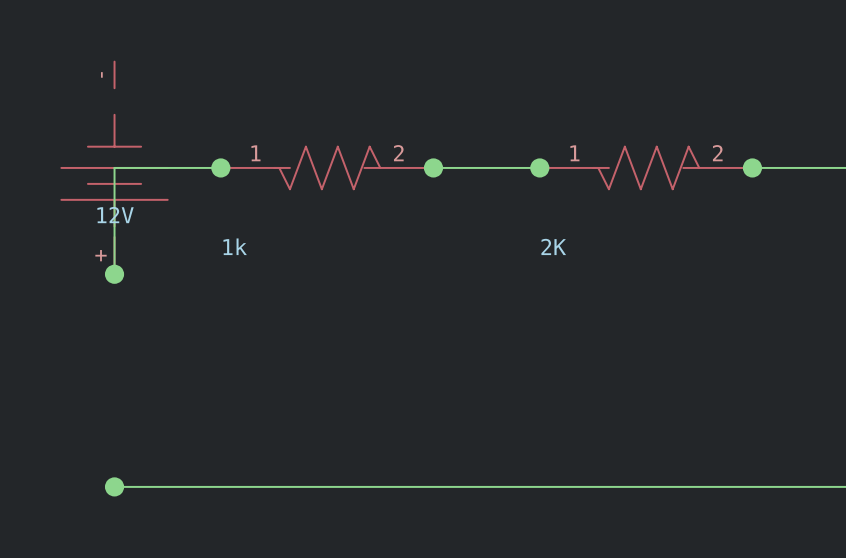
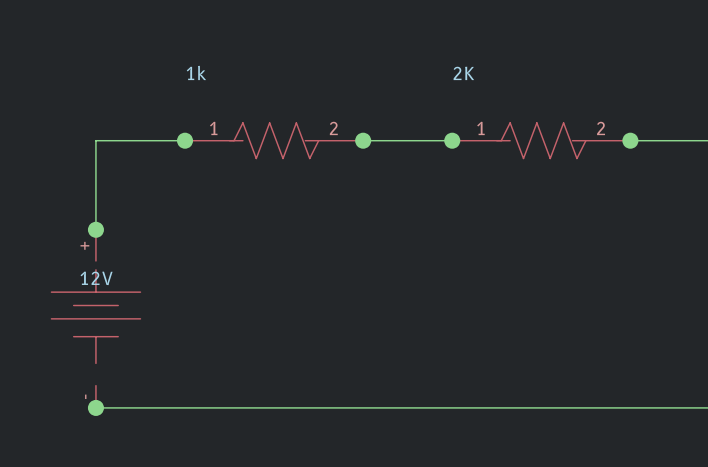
part position: (114, 167) -> (95, 318)
part flip: as is (327, 167) -> up-down (274, 140)
part flip: as is (646, 167) -> up-down (541, 140)
part rotation: 0° (114, 170) -> 180° (95, 316)

